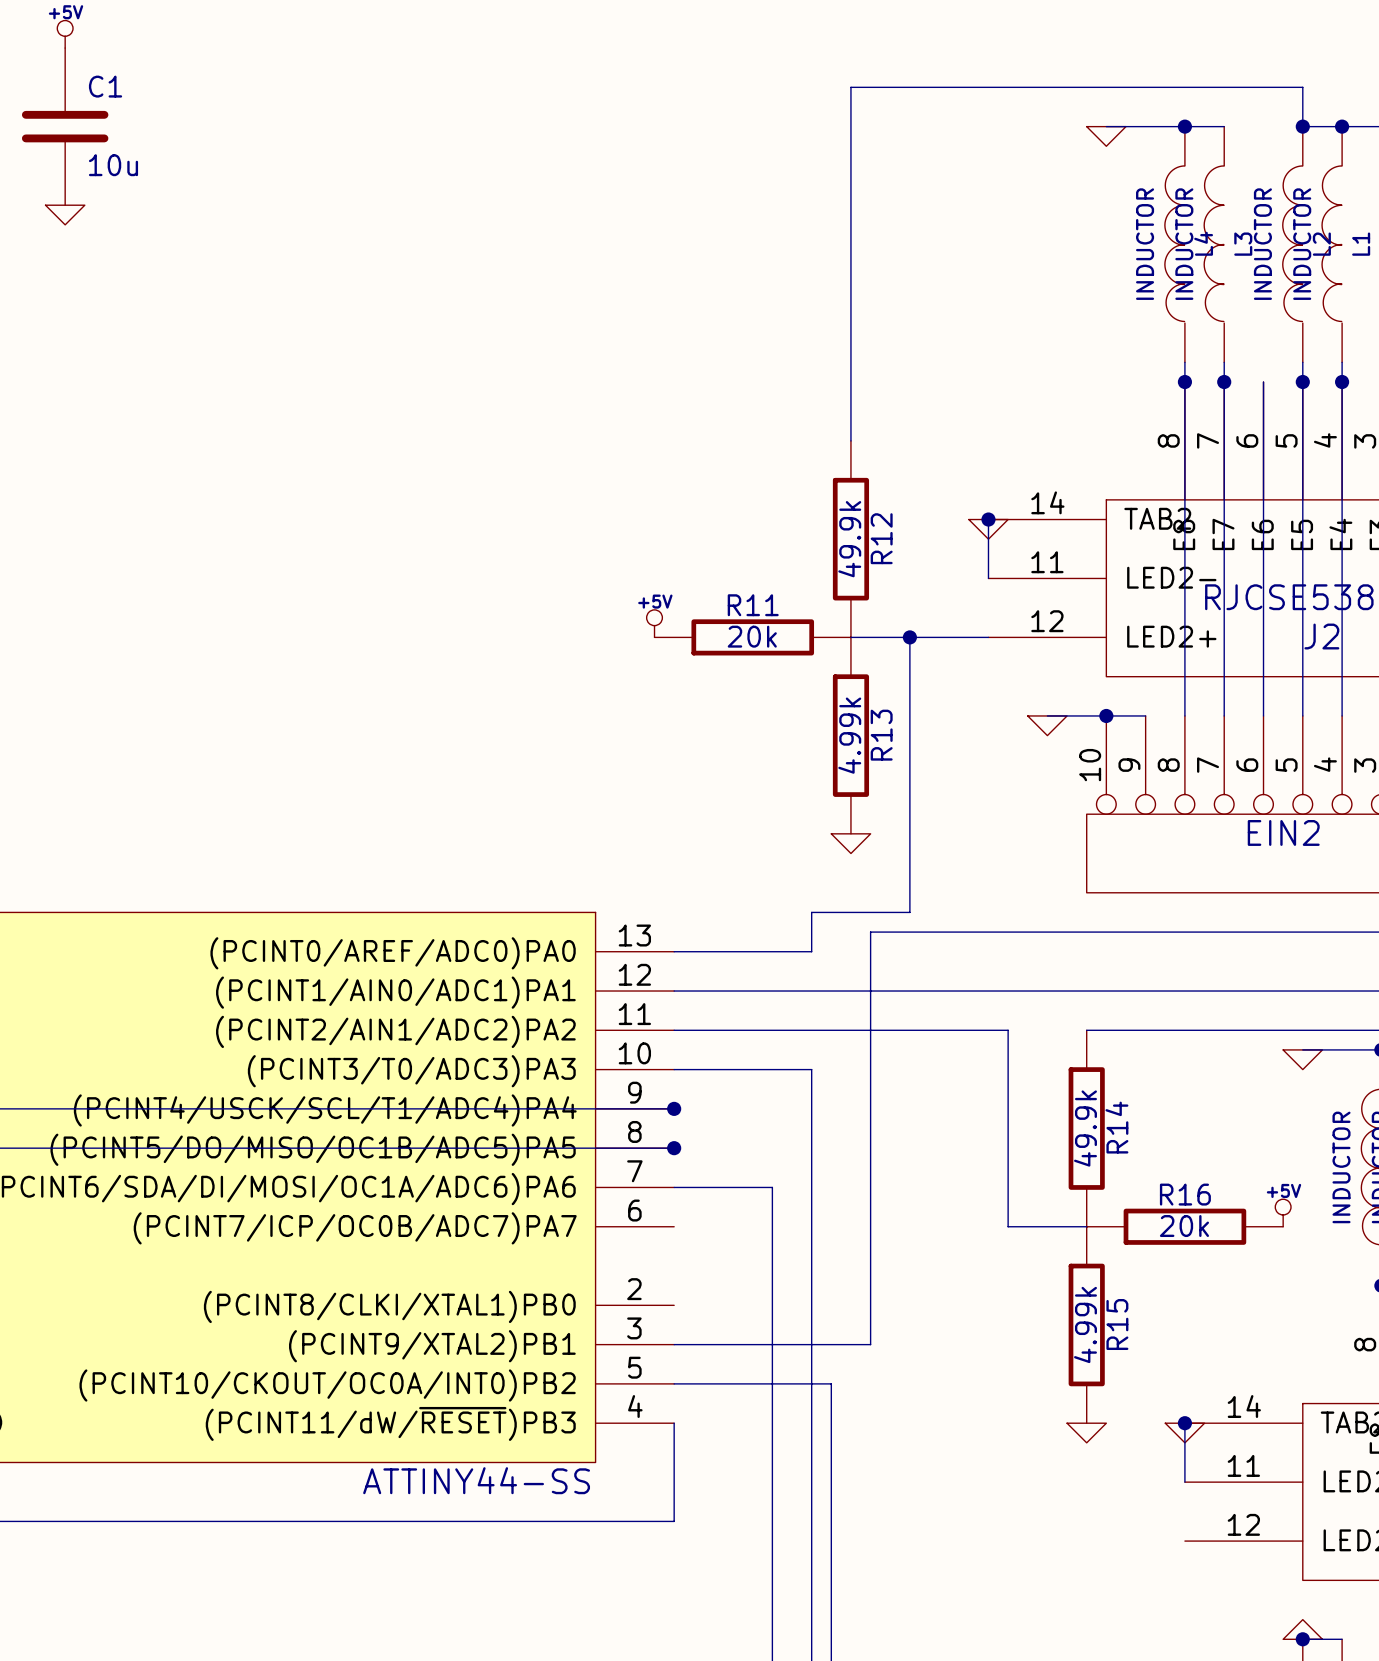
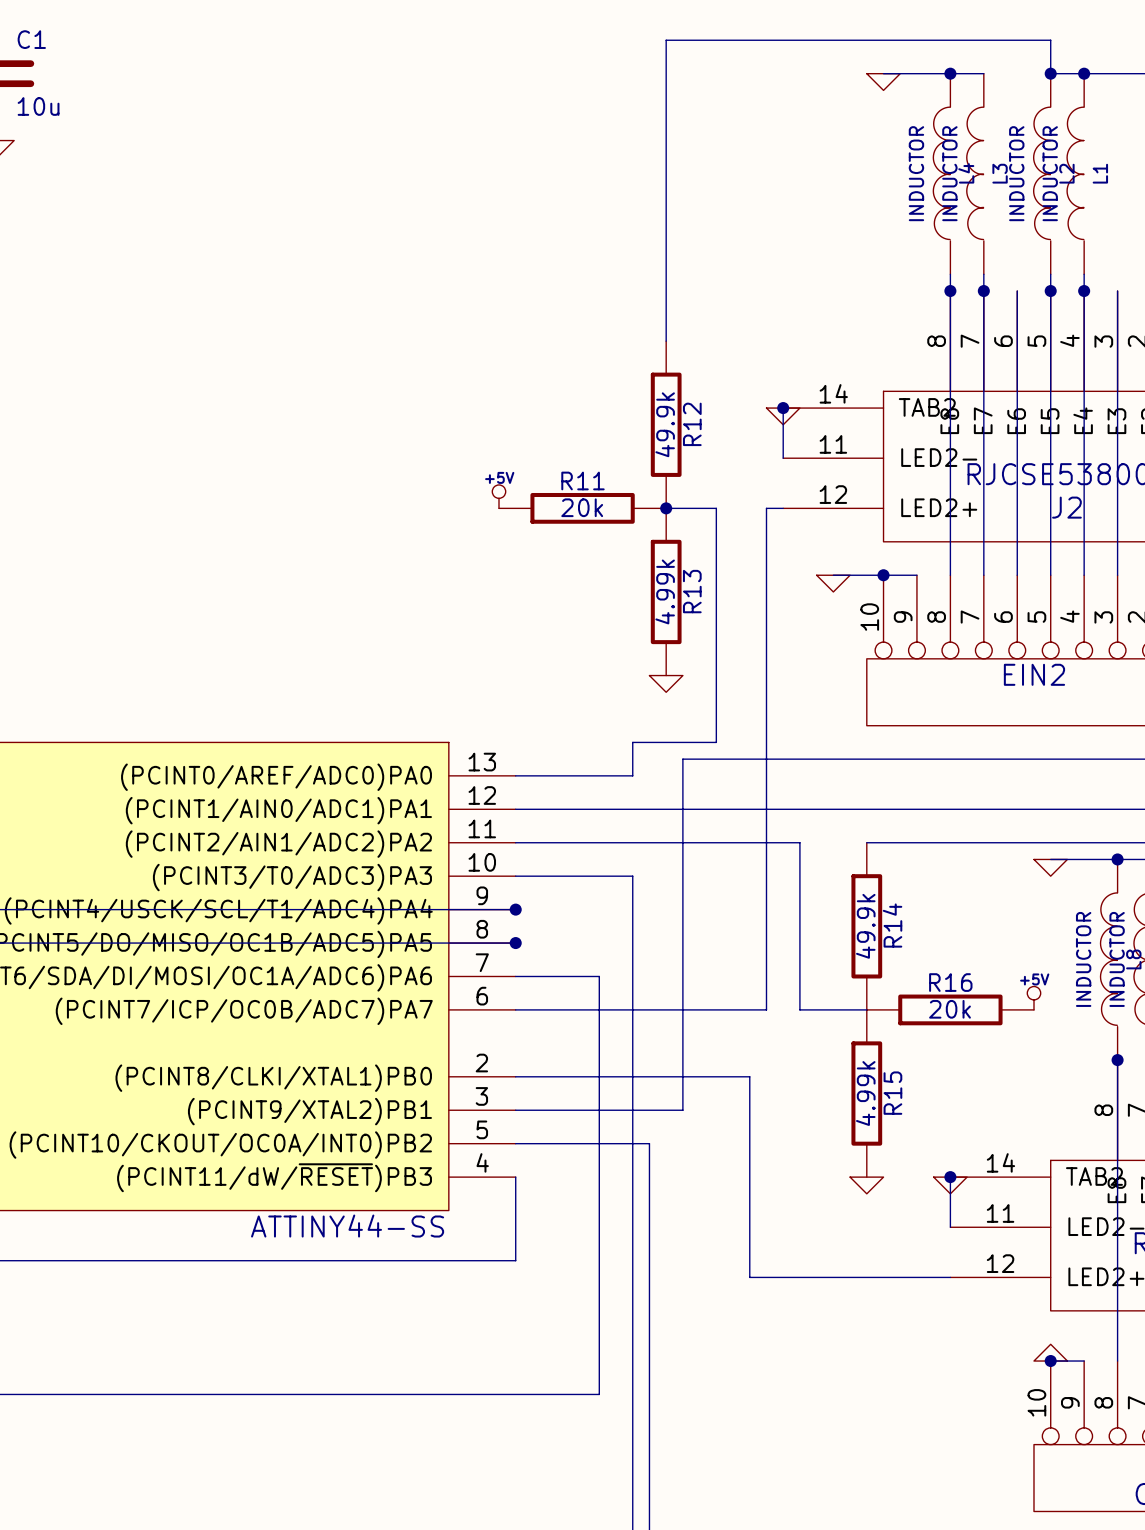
wire: (909, 637) (968, 637) -> (515, 1009) (766, 1009) (766, 508)
junction position: (909, 637) -> (666, 508)
wire: none -> (515, 1076) (749, 1076) (749, 1277) (950, 1277)

